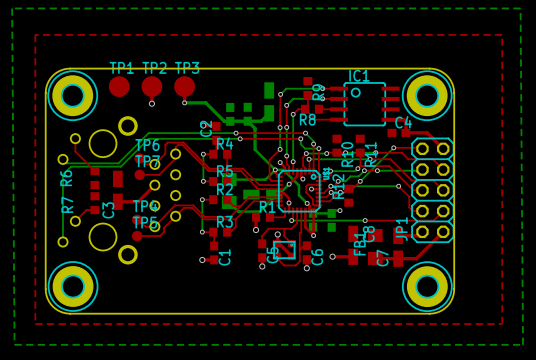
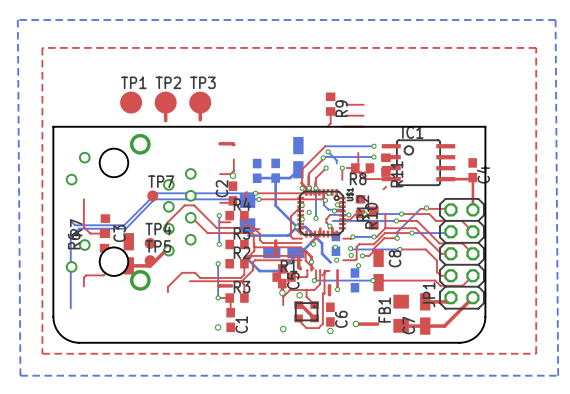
bottom track: (322, 88) (286, 88) (280, 94) -> none
via: (322, 88) -> none
top track: (280, 94) (280, 127) -> none
via: (280, 94) -> none
part: (72, 95) -> none
part: (427, 95) -> none
bottom track: (322, 98) (293, 98) (286, 105) -> none
via: (322, 98) -> none
part: (269, 101) -> none
bottom track: (184, 102) (205, 102) (224, 121) (230, 121) (230, 123) (232, 121) (261, 121) (269, 113) -> none
via: (184, 102) -> none
via: (151, 103) -> none
IC1 position: (364, 104) -> (418, 162)
top track: (286, 105) (286, 127) -> none
via: (286, 105) -> none
board edge: (45, 109) (45, 89) (48, 80) (57, 71) (70, 68) (432, 68) (444, 73) (450, 80) (454, 89) (454, 109) -> (53, 126) (485, 126)
R8 position: (312, 109) -> (362, 168)
part: (230, 114) -> none
part: (247, 114) -> none
top track: (293, 114) (298, 109) (305, 109) (315, 119) (339, 119) -> none
bottom track: (293, 114) (293, 161) -> none
via: (293, 114) -> none
top track: (390, 119) (404, 119) (406, 121) (405, 132) (427, 132) (443, 148) -> none
bottom track: (247, 121) (255, 128) (255, 149) (275, 169) -> none
via position: (203, 125) -> (233, 175)
bottom track: (280, 127) (280, 149) -> none
via: (280, 127) -> none
bottom track: (286, 127) (286, 156) -> (315, 188) (315, 218)
via: (286, 127) -> none
top track: none -> (325, 146) (302, 169) (302, 188)
bottom track: none -> (325, 146) (374, 146)
via: none -> (374, 146)
C4 rotation: 0° (398, 132) -> 90° clockwise (472, 170)
C4 position: (398, 132) -> (472, 170)
C2 position: (216, 133) -> (232, 193)
top track: (236, 133) (305, 133) -> (255, 193) (329, 193)
bottom track: (236, 133) (148, 133) (118, 163) (66, 163) (62, 159) -> none
via: (236, 133) -> none
top track: none -> (358, 152) (358, 165) (355, 168) (346, 167)
top track: (75, 138) (75, 151) (94, 171) -> none
top track: (240, 138) (300, 138) -> none
bottom track: (240, 138) (148, 138) (120, 166) (71, 166) (62, 174) (62, 241) -> none
via: (240, 138) -> none
part: none -> (298, 157)
bottom track: (300, 138) (300, 144) (305, 148) (318, 148) -> (323, 199) (323, 205) (328, 209) (343, 209)
top track: none -> (325, 157) (309, 173) (309, 188)
bottom track: none -> (325, 157) (373, 157)
via: none -> (373, 157)
top track: (313, 144) (313, 171) -> none
via: (313, 144) -> none
R10 position: (336, 145) -> (360, 206)
top track: (393, 147) (422, 148) -> (420, 208) (450, 209)
bottom track: (393, 147) (360, 181) -> none
via: (393, 147) -> none
top track: none -> (326, 168) (315, 178) (315, 188)
via: none -> (326, 168)
top track: none -> (355, 168) (366, 179) (391, 179)
top track: (280, 149) (269, 159) (269, 178) (271, 180) (279, 180) -> (302, 205) (290, 216) (290, 236) (293, 238) (301, 238)
via: (280, 149) -> none
bottom track: none -> (298, 169) (290, 178) (257, 178)
part: none -> (257, 170)
part: none -> (275, 170)
bottom track: (345, 152) (375, 152) -> (369, 214) (401, 214)
via: (345, 152) -> none
top track: (360, 152) (360, 166) (389, 166) (413, 190) (422, 190) -> none
top track: (375, 152) (401, 152) (408, 159) (432, 159) (443, 169) -> (401, 214) (429, 214) (436, 220) (462, 220) (472, 231)
via: (375, 152) -> none
top track: (306, 153) (303, 157) (305, 171) -> none
bottom track: (306, 153) (326, 153) -> none
via: (306, 153) -> none
via: (326, 153) -> none
bottom track: (203, 154) (203, 181) -> (219, 215) (219, 244)
via: (203, 154) -> none
R4 position: (220, 154) -> (237, 215)
top track: (227, 154) (228, 168) -> none
via: (286, 156) -> none
bottom track: none -> (275, 178) (275, 205) (297, 227)
TP6: (139, 158) -> none
top track: none -> (445, 179) (471, 179)
top track: none -> (471, 179) (472, 180) (472, 209)
top track: (309, 159) (309, 171) -> none
bottom track: (309, 159) (370, 159) -> none
via: (309, 159) -> none
top track: (318, 159) (318, 176) -> none
top track: (370, 159) (390, 159) (411, 180) (433, 180) (443, 190) -> none
via: (370, 159) -> none
via: (293, 161) -> none
via: (280, 162) -> none
top track: (144, 164) (154, 164) (165, 153) (165, 144) (167, 142) (183, 142) (209, 168) (243, 168) (259, 185) (279, 185) -> none
via: none -> (302, 188)
via: none -> (309, 188)
via: none -> (315, 188)
bottom track: (357, 168) (355, 171) (330, 171) -> none
via: (357, 168) -> none
top track: (275, 169) (279, 176) -> (297, 227) (301, 234)
bottom track: (275, 169) (283, 169) (298, 185) (298, 195) (307, 203) -> (297, 227) (305, 227) (322, 243) (322, 253) (330, 262)
bottom track: (275, 169) (265, 179) (229, 179) -> none
via: (275, 169) -> none
bottom track: (422, 169) (377, 170) -> none
top track: (364, 170) (377, 170) -> none
bottom track: (364, 170) (358, 176) (350, 176) (345, 181) (338, 181) -> none
via: (364, 170) -> none
via: (377, 170) -> none
top track: (297, 171) (297, 176) (289, 184) -> (320, 228) (320, 233) (311, 242)
top track: (330, 171) (330, 175) (324, 180) (318, 180) -> none
via: (330, 171) -> none
bottom track: none -> (255, 193) (156, 193) (124, 225) (74, 225) (70, 221)
via: none -> (255, 193)
via: none -> (329, 193)
top track: (139, 174) (159, 174) (175, 158) (175, 147) (182, 144) (208, 171) (241, 171) (258, 189) (279, 189) -> none
top track: none -> (83, 199) (83, 227) (90, 233) (104, 233)
R6 position: (94, 178) -> (104, 240)
top track: none -> (259, 199) (323, 199)
bottom track: none -> (259, 199) (154, 199) (152, 201)
via: none -> (259, 199)
bottom track: none -> (152, 201) (125, 228) (79, 228) (70, 237) (70, 308)
via: (203, 181) -> none
R5 position: (220, 181) -> (237, 244)
top track: (338, 181) (335, 183) (335, 195) (329, 201) (318, 201) -> none
via: (338, 181) -> none
top track: (360, 181) (352, 188) (348, 188) (348, 186) -> none
via: (360, 181) -> none
via: none -> (302, 205)
via: none -> (337, 204)
bottom track: (289, 184) (278, 194) (274, 194) (274, 197) (259, 211) (238, 211) (229, 202) -> none
via: (289, 184) -> none
top track: (154, 185) (138, 201) (117, 201) -> (167, 248) (150, 265) (128, 265)
top track: (318, 185) (306, 186) (306, 192) (312, 199) (312, 204) (318, 205) -> none
top track: (330, 186) (323, 193) (318, 193) -> none
bottom track: (330, 186) (398, 186) -> none
via: (330, 186) -> none
top track: (398, 186) (409, 196) (409, 207) (412, 211) (422, 211) -> none
bottom track: none -> (420, 208) (397, 232) (397, 238)
C3 position: (117, 190) -> (128, 253)
via: none -> (309, 212)
JP1 position: (432, 190) -> (461, 253)
top track: none -> (385, 213) (385, 228)
via: none -> (401, 214)
top track: none -> (329, 214) (326, 219) (328, 228)
bottom track: none -> (329, 214) (348, 214)
via: none -> (348, 214)
via: (331, 192) -> none
top track: none -> (189, 215) (207, 233) (252, 233) (254, 247) (301, 247)
via: none -> (219, 215)
top track: (279, 193) (283, 193) (289, 198) (289, 210) -> (301, 251) (306, 251) (311, 257) (311, 270)
part: (262, 194) -> none
via: none -> (302, 219)
via: none -> (315, 218)
top track: (279, 197) (249, 197) (230, 216) (204, 216) (193, 205) (174, 205) (154, 226) (145, 226) (137, 219) -> none
bottom track: none -> (332, 220) (396, 220)
top track: none -> (396, 220) (417, 220) (439, 243) (462, 243) (472, 253)
via: none -> (396, 220)
bottom track: (202, 199) (202, 232) -> (218, 263) (218, 297)
via: (202, 199) -> none
R2 position: (220, 199) -> (237, 263)
top track: (279, 201) (253, 201) (235, 219) (203, 219) (192, 207) (184, 207) (164, 227) (164, 231) (160, 236) (137, 236) -> none
via: (289, 202) -> none
top track: none -> (167, 226) (167, 222) (184, 205) (194, 205) (216, 227) (253, 227) (259, 233) (259, 239) (262, 242) (301, 242)
bottom track: none -> (297, 227) (288, 235) (248, 235)
via: none -> (297, 227)
top track: none -> (385, 228) (415, 228) (441, 253) (450, 253)
top track: none -> (385, 228) (376, 236) (374, 236)
bottom track: none -> (450, 231) (411, 233)
top track: none -> (411, 233) (385, 233) (373, 244) (359, 244) (356, 246) (355, 260) (343, 260)
via: none -> (411, 233)
top track: (94, 210) (86, 210) (75, 221) -> none
top track: (284, 210) (284, 217) (269, 217) -> (307, 270) (306, 277) (291, 277)
top track: (293, 210) (291, 220) -> (315, 270) (314, 280)
top track: (297, 210) (297, 223) (291, 228) (268, 228) (262, 236) (262, 243) -> none
top track: (301, 210) (299, 261) (295, 265) (284, 265) (276, 256) -> (324, 270) (322, 323) (318, 328) (306, 328) (298, 318)
top track: (305, 210) (305, 227) (313, 235) (313, 210) -> none
bottom track: (339, 210) (333, 210) (331, 213) (312, 213) -> none
via: (339, 210) -> none
top track: (443, 211) (433, 220) (365, 220) -> none
top track: none -> (352, 236) (343, 238)
bottom track: none -> (352, 236) (374, 236)
via: none -> (352, 236)
via: none -> (374, 236)
top track: none -> (397, 238) (384, 238) (369, 255) (362, 255)
via: none -> (397, 238)
R1 position: (263, 217) -> (284, 277)
bottom track: none -> (311, 242) (300, 253) (295, 253) (295, 255) (280, 271) (259, 271) (248, 259)
via: none -> (219, 244)
bottom track: (291, 220) (365, 220) -> none
part position: (331, 220) -> (354, 280)
via: (365, 220) -> none
via: none -> (335, 247)
bottom track: none -> (350, 248) (399, 249)
via: none -> (350, 248)
top track: none -> (399, 249) (425, 249) (437, 260) (437, 271) (440, 275) (450, 275)
via: none -> (399, 249)
part: none -> (283, 253)
via: (256, 230) -> none
top track: none -> (301, 255) (252, 255) (244, 263) (244, 274) (240, 277) (200, 277) (195, 272) (182, 272) (167, 286) (167, 292)
via: none -> (351, 255)
via: none -> (362, 255)
top track: (422, 231) (418, 235) (398, 235) -> (450, 297) (446, 301) (425, 301)
top track: (443, 231) (416, 258) (375, 258) -> (472, 297) (444, 326) (401, 325)
top track: (202, 232) (214, 233) (214, 245) -> (218, 298) (230, 298) (230, 312)
via: (202, 232) -> none
R3 position: (220, 232) -> (237, 298)
via: (277, 234) -> none
top track: none -> (301, 260) (255, 260) (252, 262) (252, 270) (241, 281) (189, 281)
via: none -> (311, 262)
via: none -> (218, 263)
via: none -> (358, 265)
top track: (276, 243) (279, 243) (291, 256) -> (298, 305) (301, 305) (314, 318)
top track: none -> (320, 270) (320, 284) (314, 290) (290, 290) (283, 296) (283, 305)
top track: none -> (337, 270) (337, 289)
FB1 position: (375, 247) -> (401, 313)
C7 position: (398, 247) -> (425, 313)
top track: none -> (104, 274) (86, 275) (83, 277) (83, 286)
part position: (284, 250) -> (306, 311)
top track: none -> (472, 275) (462, 285) (440, 285) (435, 280) (373, 280)
C1 position: (214, 252) -> (230, 320)
C6 position: (306, 252) -> (330, 314)
bottom track: none -> (314, 280) (373, 280)
via: none -> (314, 280)
via: none -> (373, 280)
top track: none -> (240, 281) (244, 284) (244, 298)
top track: (332, 256) (353, 256) -> (355, 323) (377, 324)
via: (332, 256) -> none
via: (202, 260) -> none
top track: none -> (306, 290) (306, 296) (314, 305)
via: none -> (337, 289)
via: none -> (299, 295)
via: (306, 268) -> none
via: none -> (218, 297)
part: (73, 286) -> none
part: (427, 286) -> none
via: none -> (355, 323)
via: none -> (218, 327)
via: none -> (283, 329)
via: none -> (330, 331)

